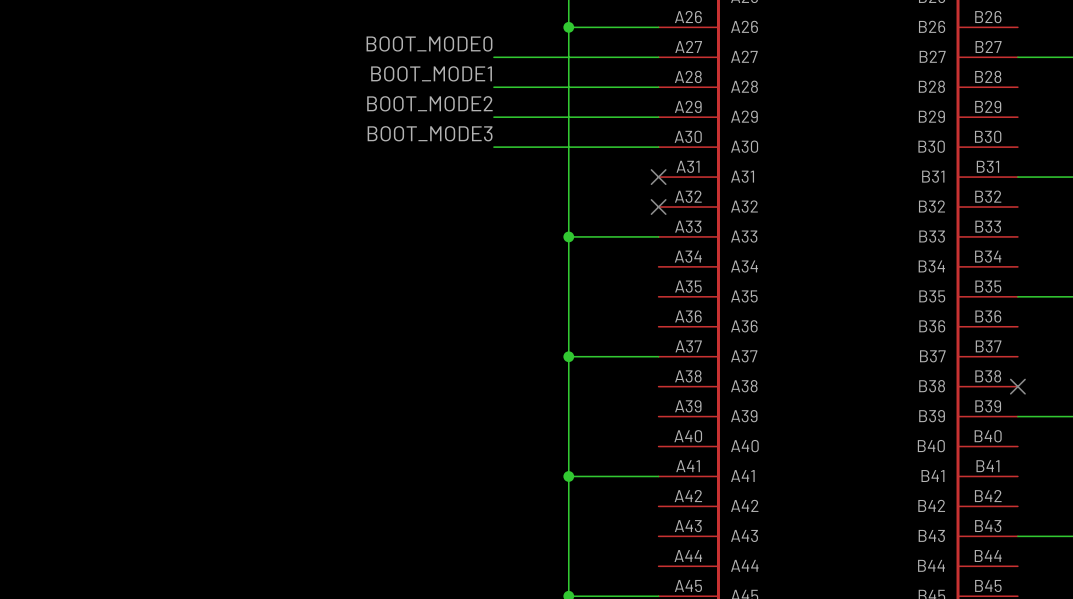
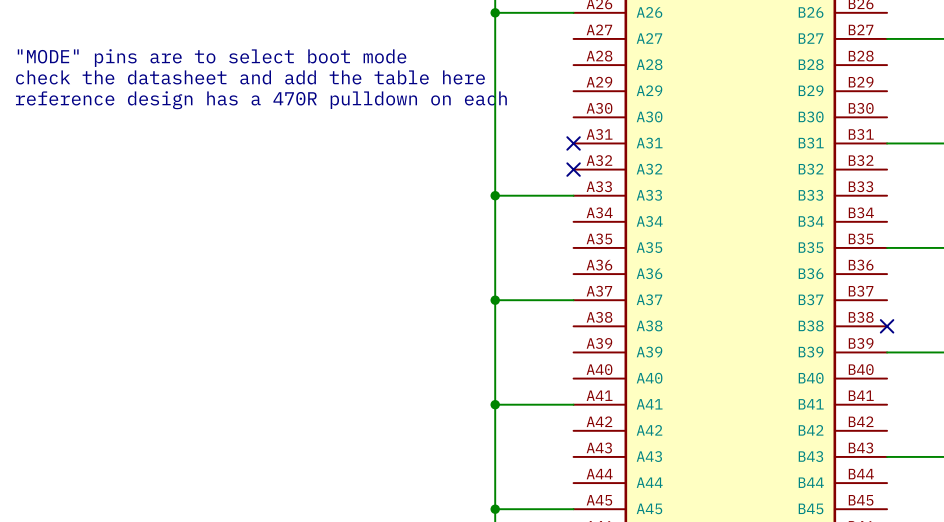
label: BOOT_MODE0 (429, 43) -> none
wire: (493, 57) (658, 57) -> none
label: BOOT_MODE1 (431, 73) -> none
text: none -> "MODE" pins are to select boot mode (212, 58)
wire: (493, 87) (658, 87) -> none
text: none -> check the datasheet and add the table here (250, 77)
label: BOOT_MODE2 (429, 103) -> none
wire: (493, 117) (658, 117) -> none
text: none -> reference design has a 470R pulldown on each (261, 100)
label: BOOT_MODE3 (430, 133) -> none
wire: (493, 147) (658, 147) -> none

